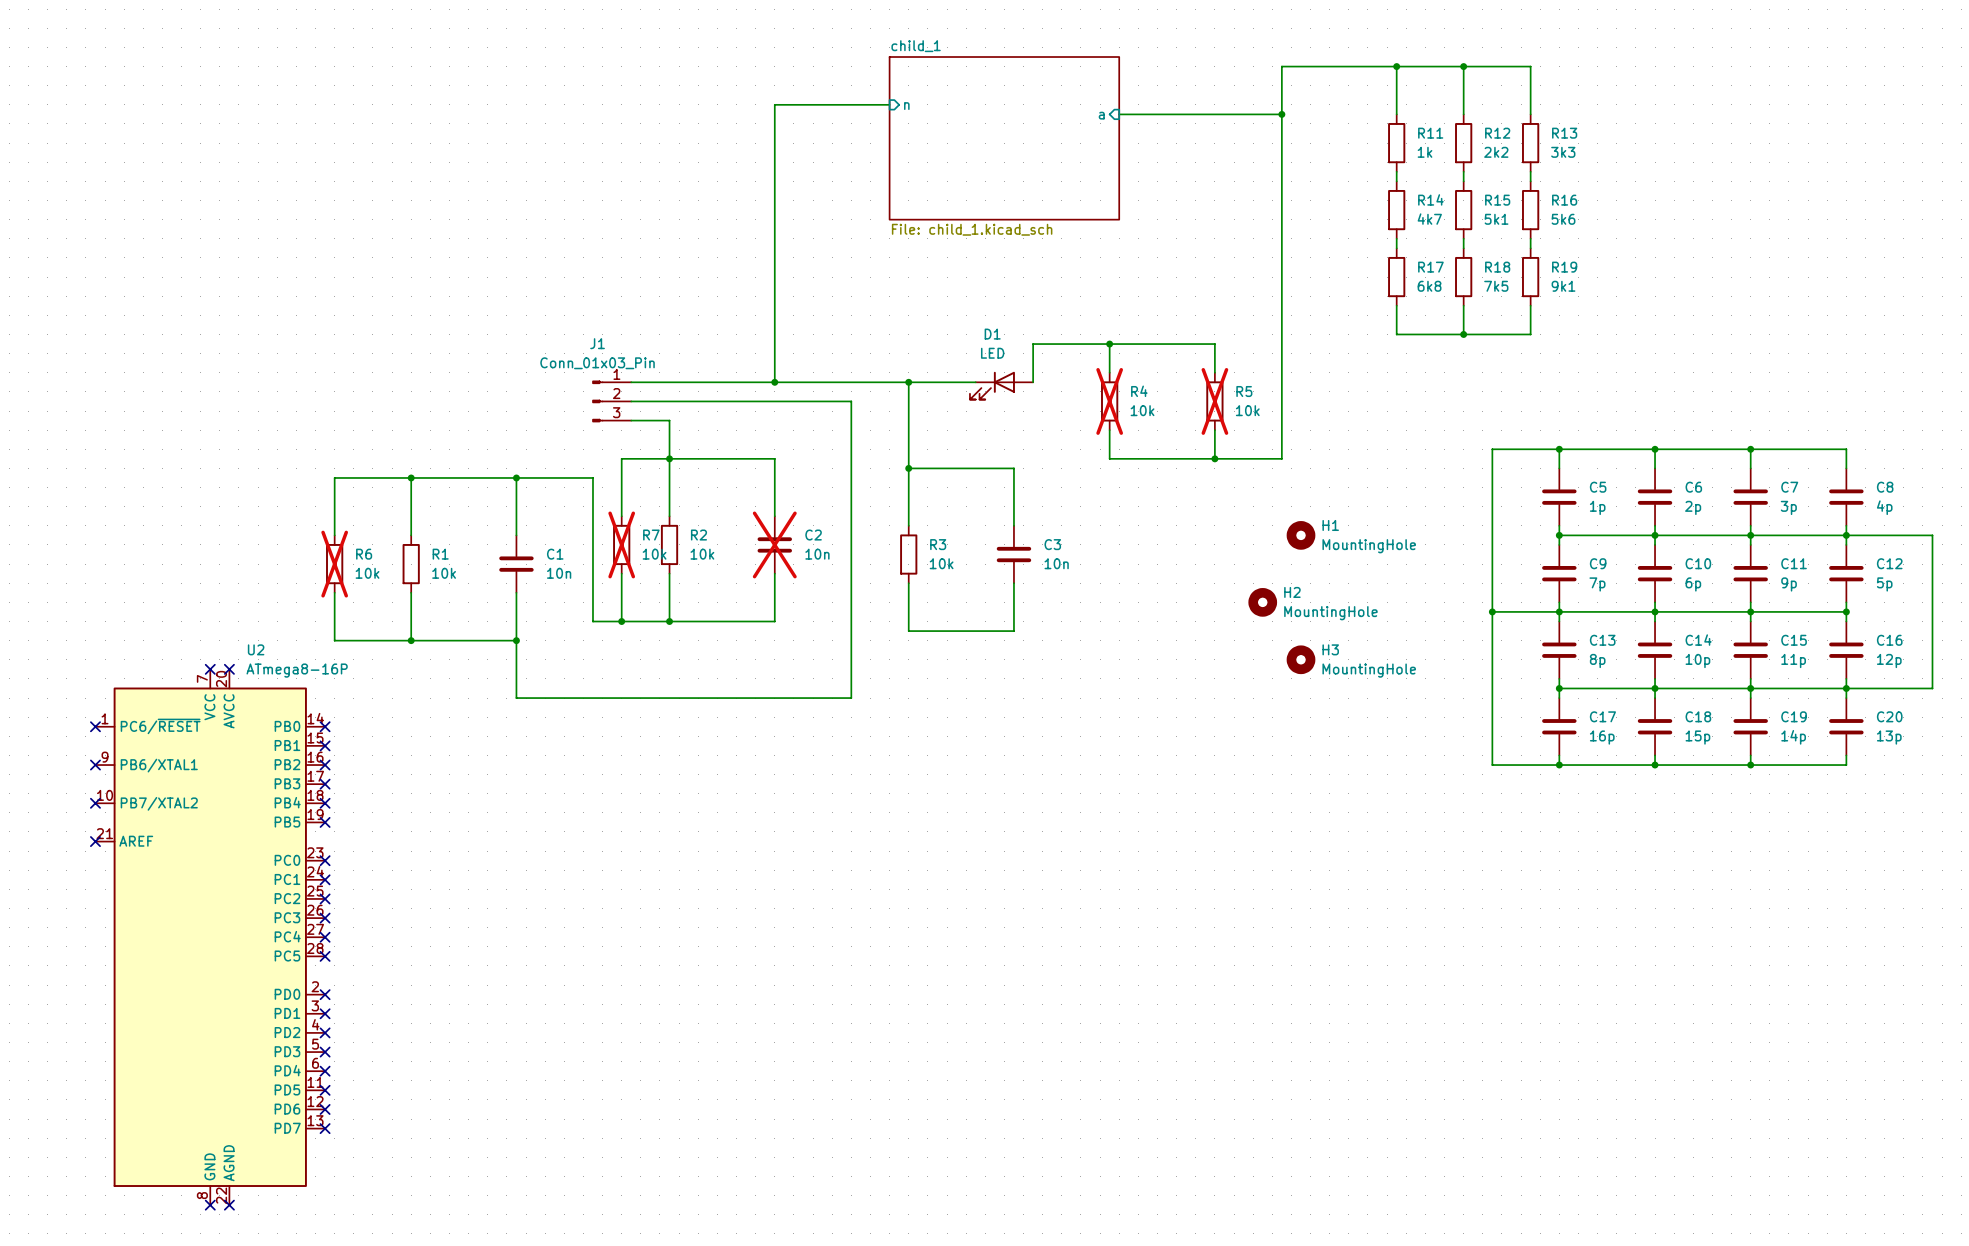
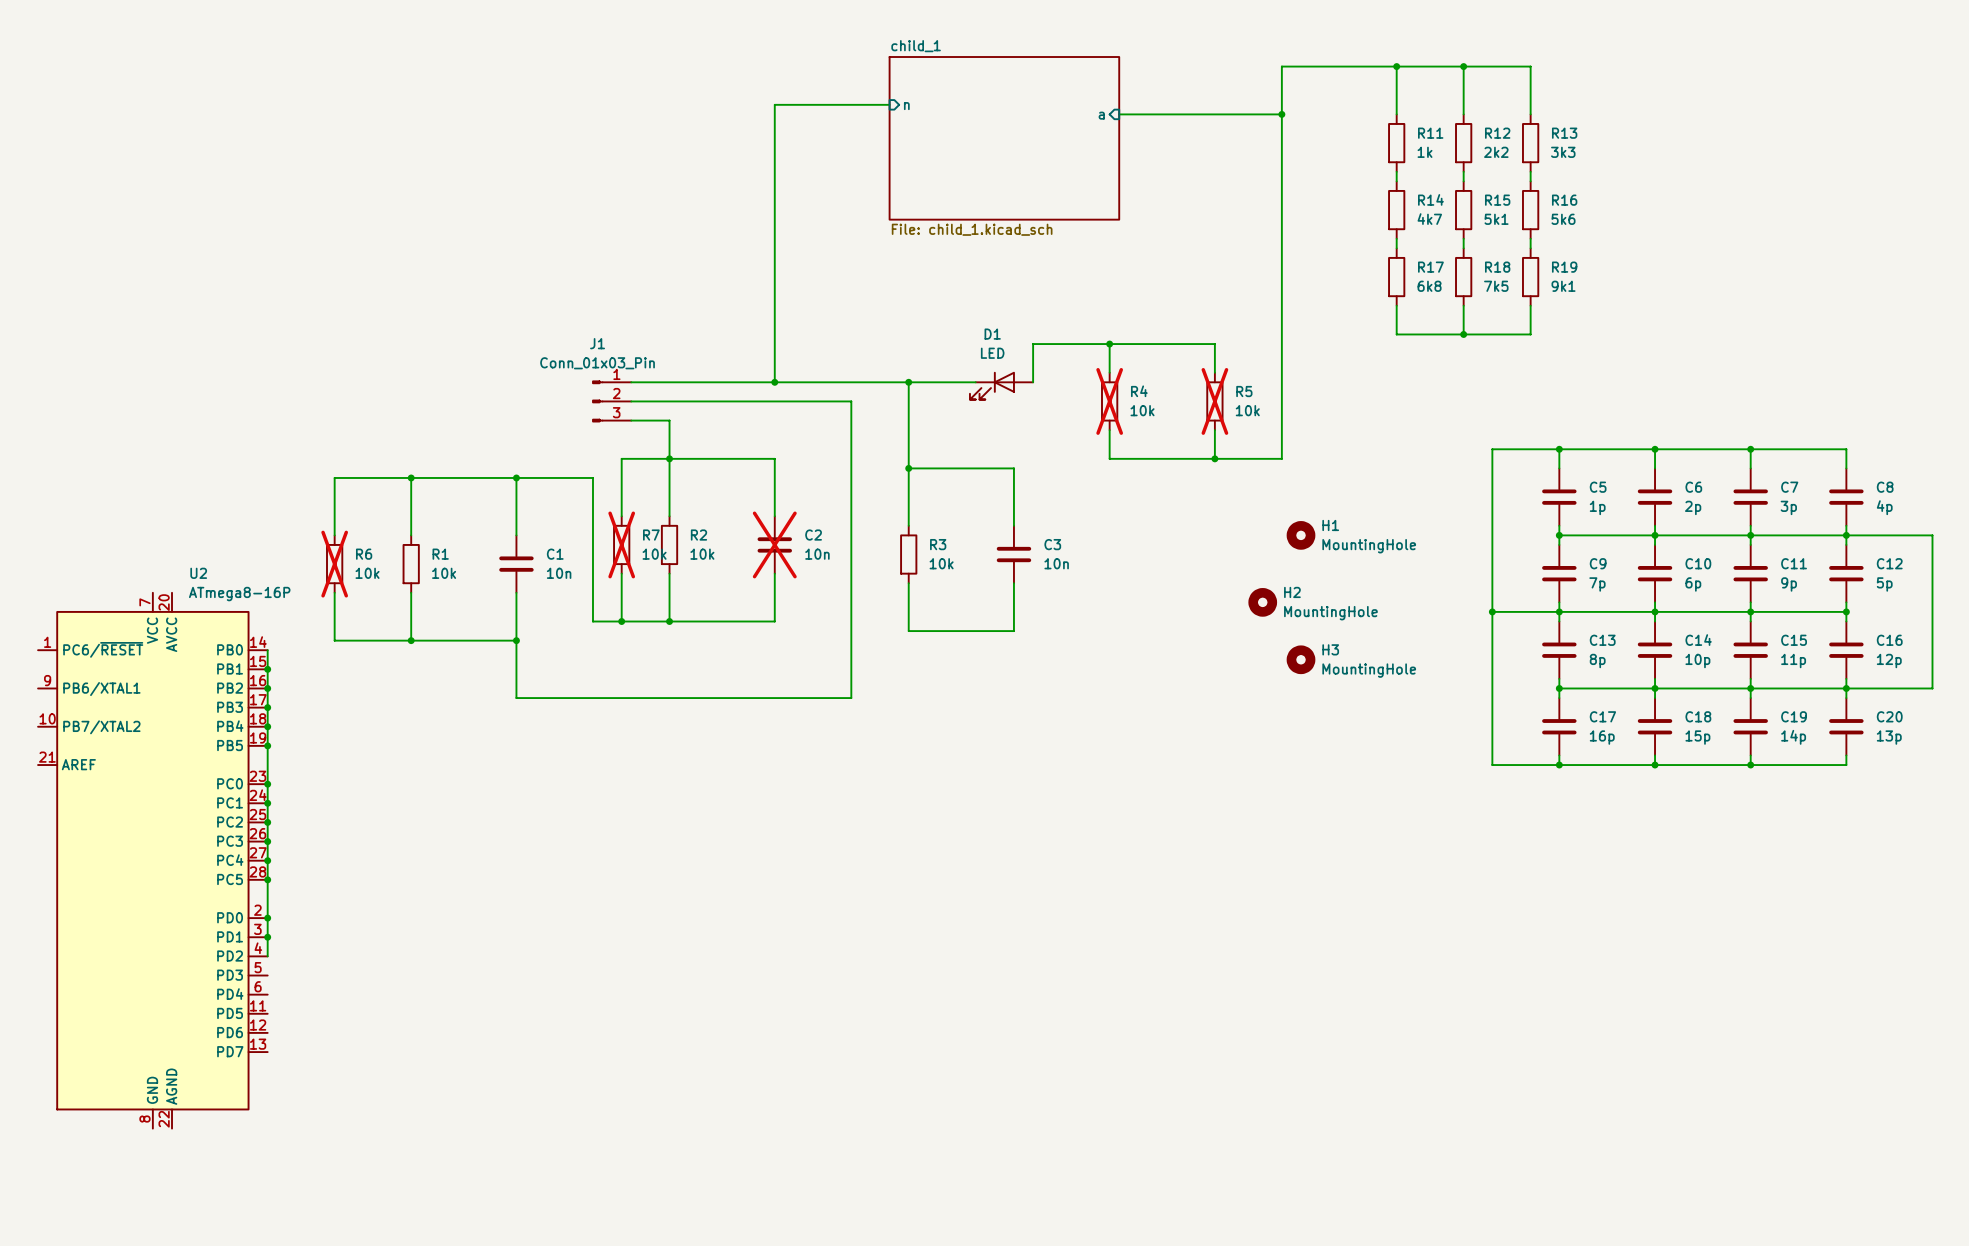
no-connect mark: (210, 669) -> none
no-connect mark: (229, 669) -> none
junction: none -> (267, 669)
junction: none -> (267, 688)
junction: none -> (267, 707)
no-connect mark: (95, 726) -> none
junction: none -> (267, 726)
no-connect mark: (325, 726) -> none
junction: none -> (267, 745)
no-connect mark: (325, 745) -> none
no-connect mark: (95, 765) -> none
no-connect mark: (325, 765) -> none
junction: none -> (267, 784)
no-connect mark: (325, 784) -> none
no-connect mark: (95, 803) -> none
junction: none -> (267, 803)
no-connect mark: (325, 803) -> none
junction: none -> (267, 822)
no-connect mark: (325, 822) -> none
no-connect mark: (95, 841) -> none
junction: none -> (267, 841)
junction: none -> (267, 860)
no-connect mark: (325, 860) -> none
junction: none -> (267, 879)
no-connect mark: (325, 879) -> none
no-connect mark: (325, 898) -> none
junction: none -> (267, 918)
no-connect mark: (325, 918) -> none
U2 position: (210, 937) -> (152, 860)
junction: none -> (267, 937)
no-connect mark: (325, 937) -> none
no-connect mark: (325, 956) -> none
no-connect mark: (325, 994) -> none
no-connect mark: (325, 1013) -> none
no-connect mark: (325, 1032) -> none
no-connect mark: (325, 1052) -> none
no-connect mark: (325, 1071) -> none
no-connect mark: (325, 1090) -> none
no-connect mark: (325, 1109) -> none
no-connect mark: (325, 1128) -> none
no-connect mark: (210, 1205) -> none
no-connect mark: (229, 1205) -> none

